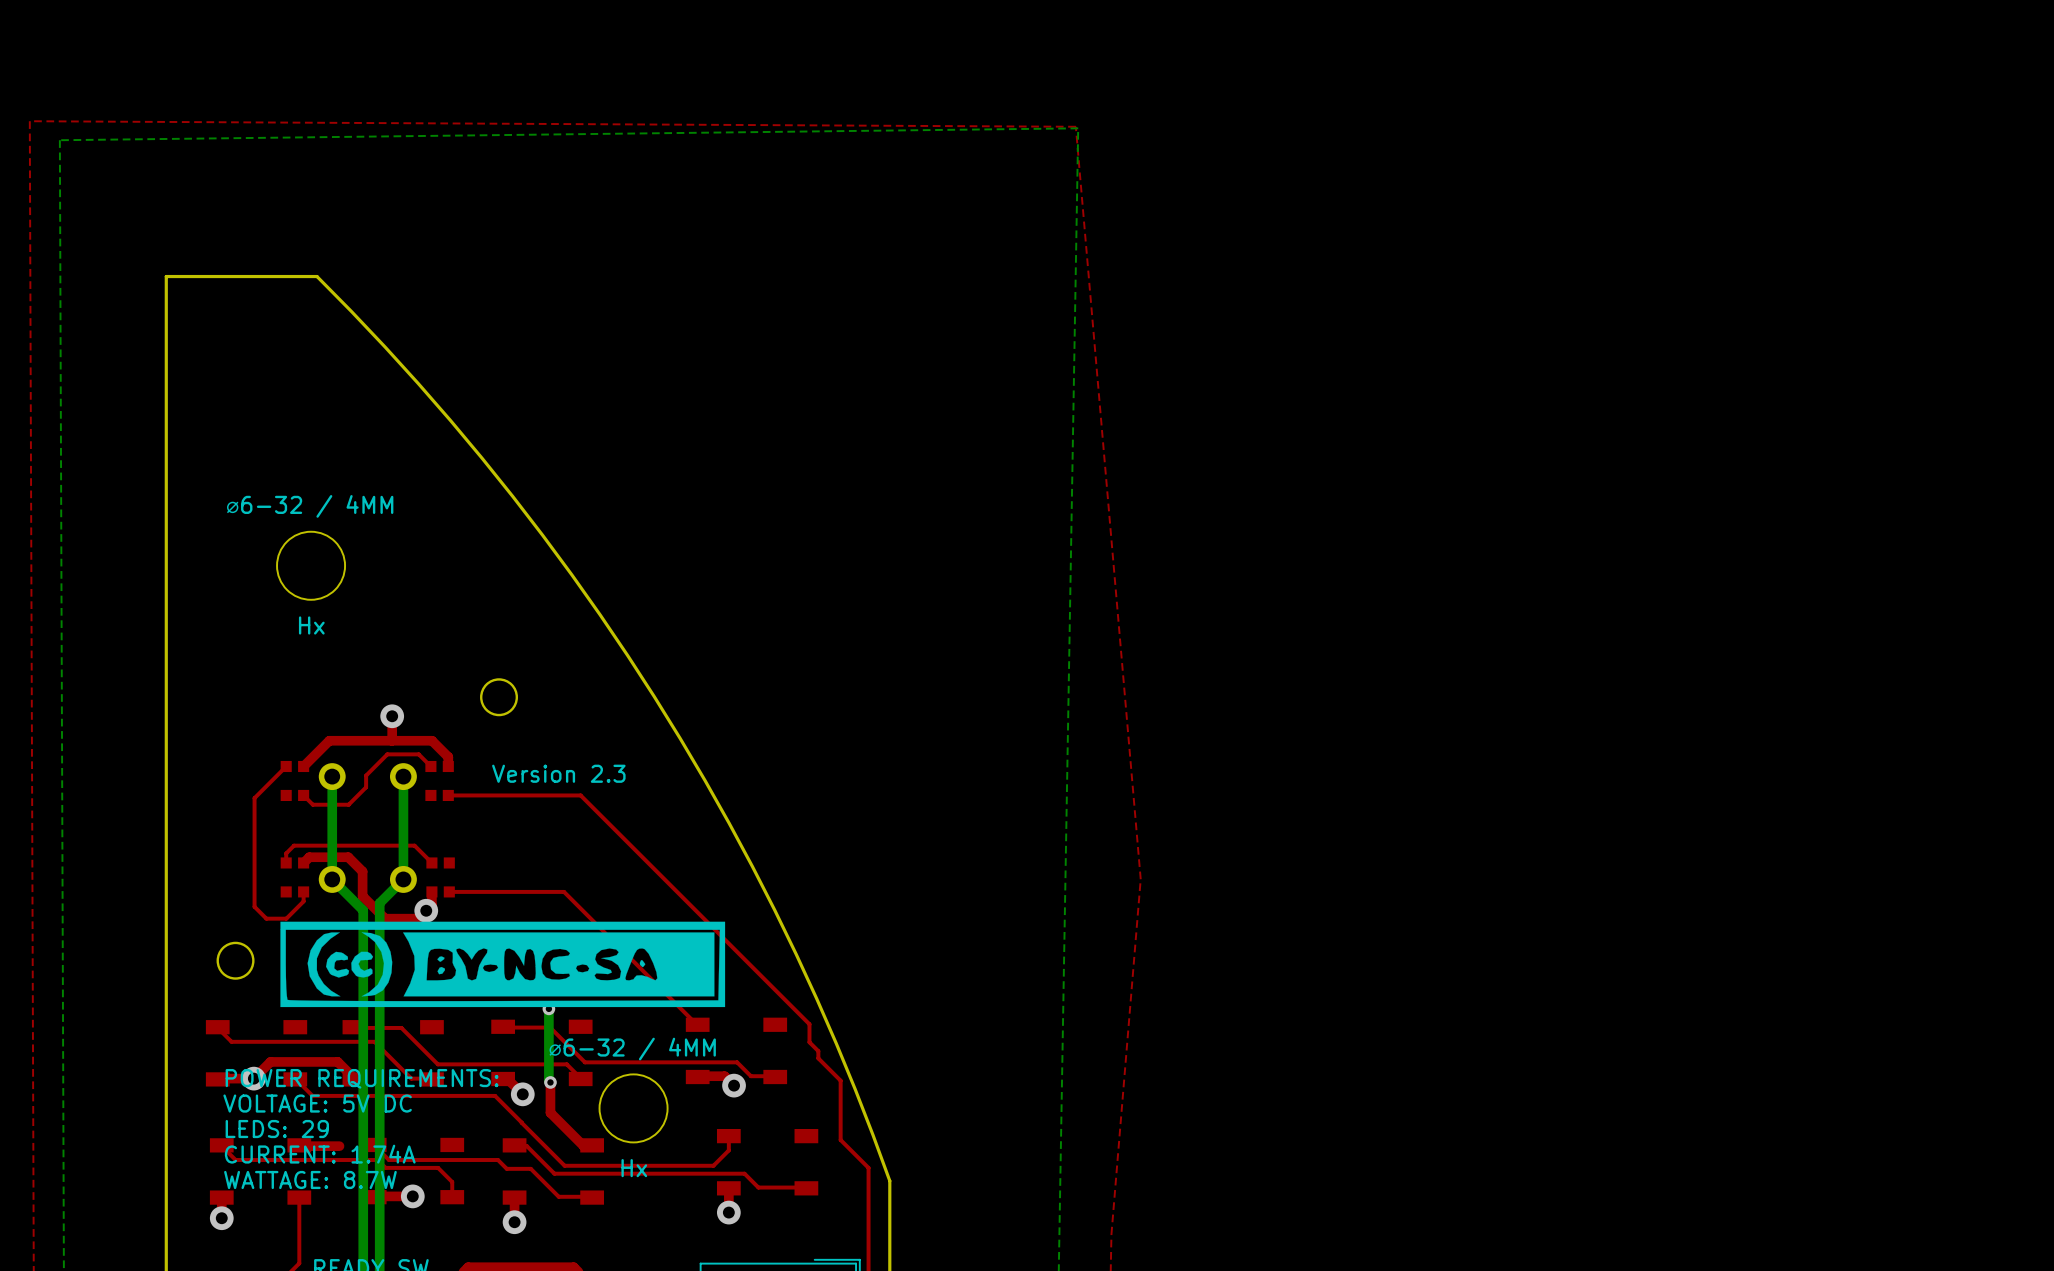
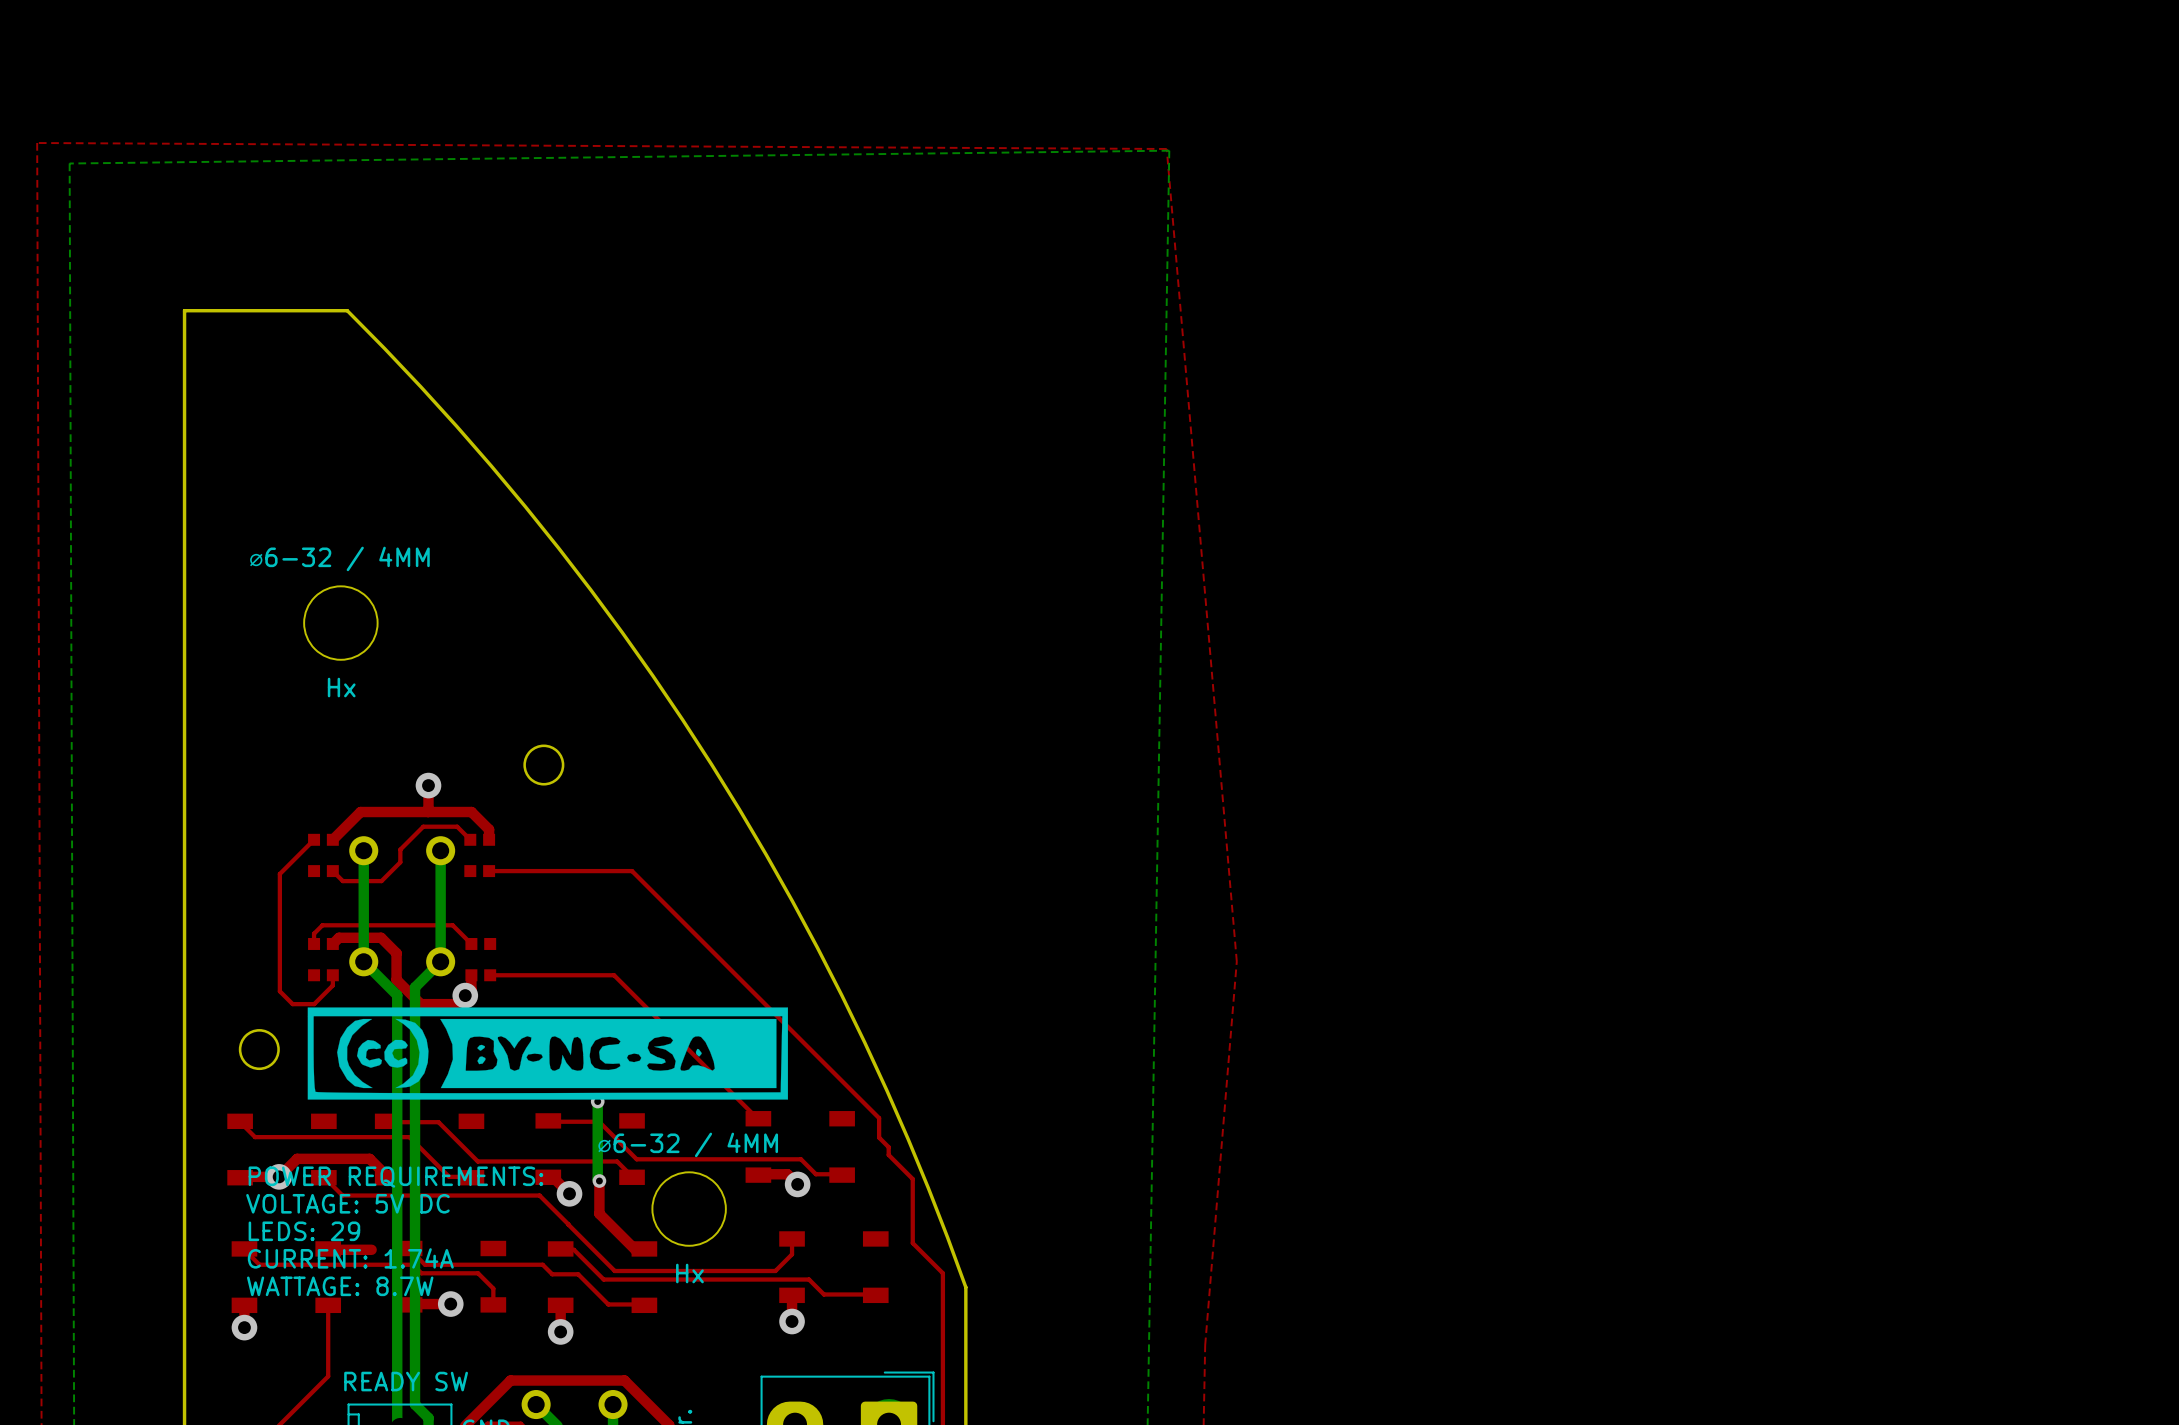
text: Version 2.3 (558, 773) -> none

